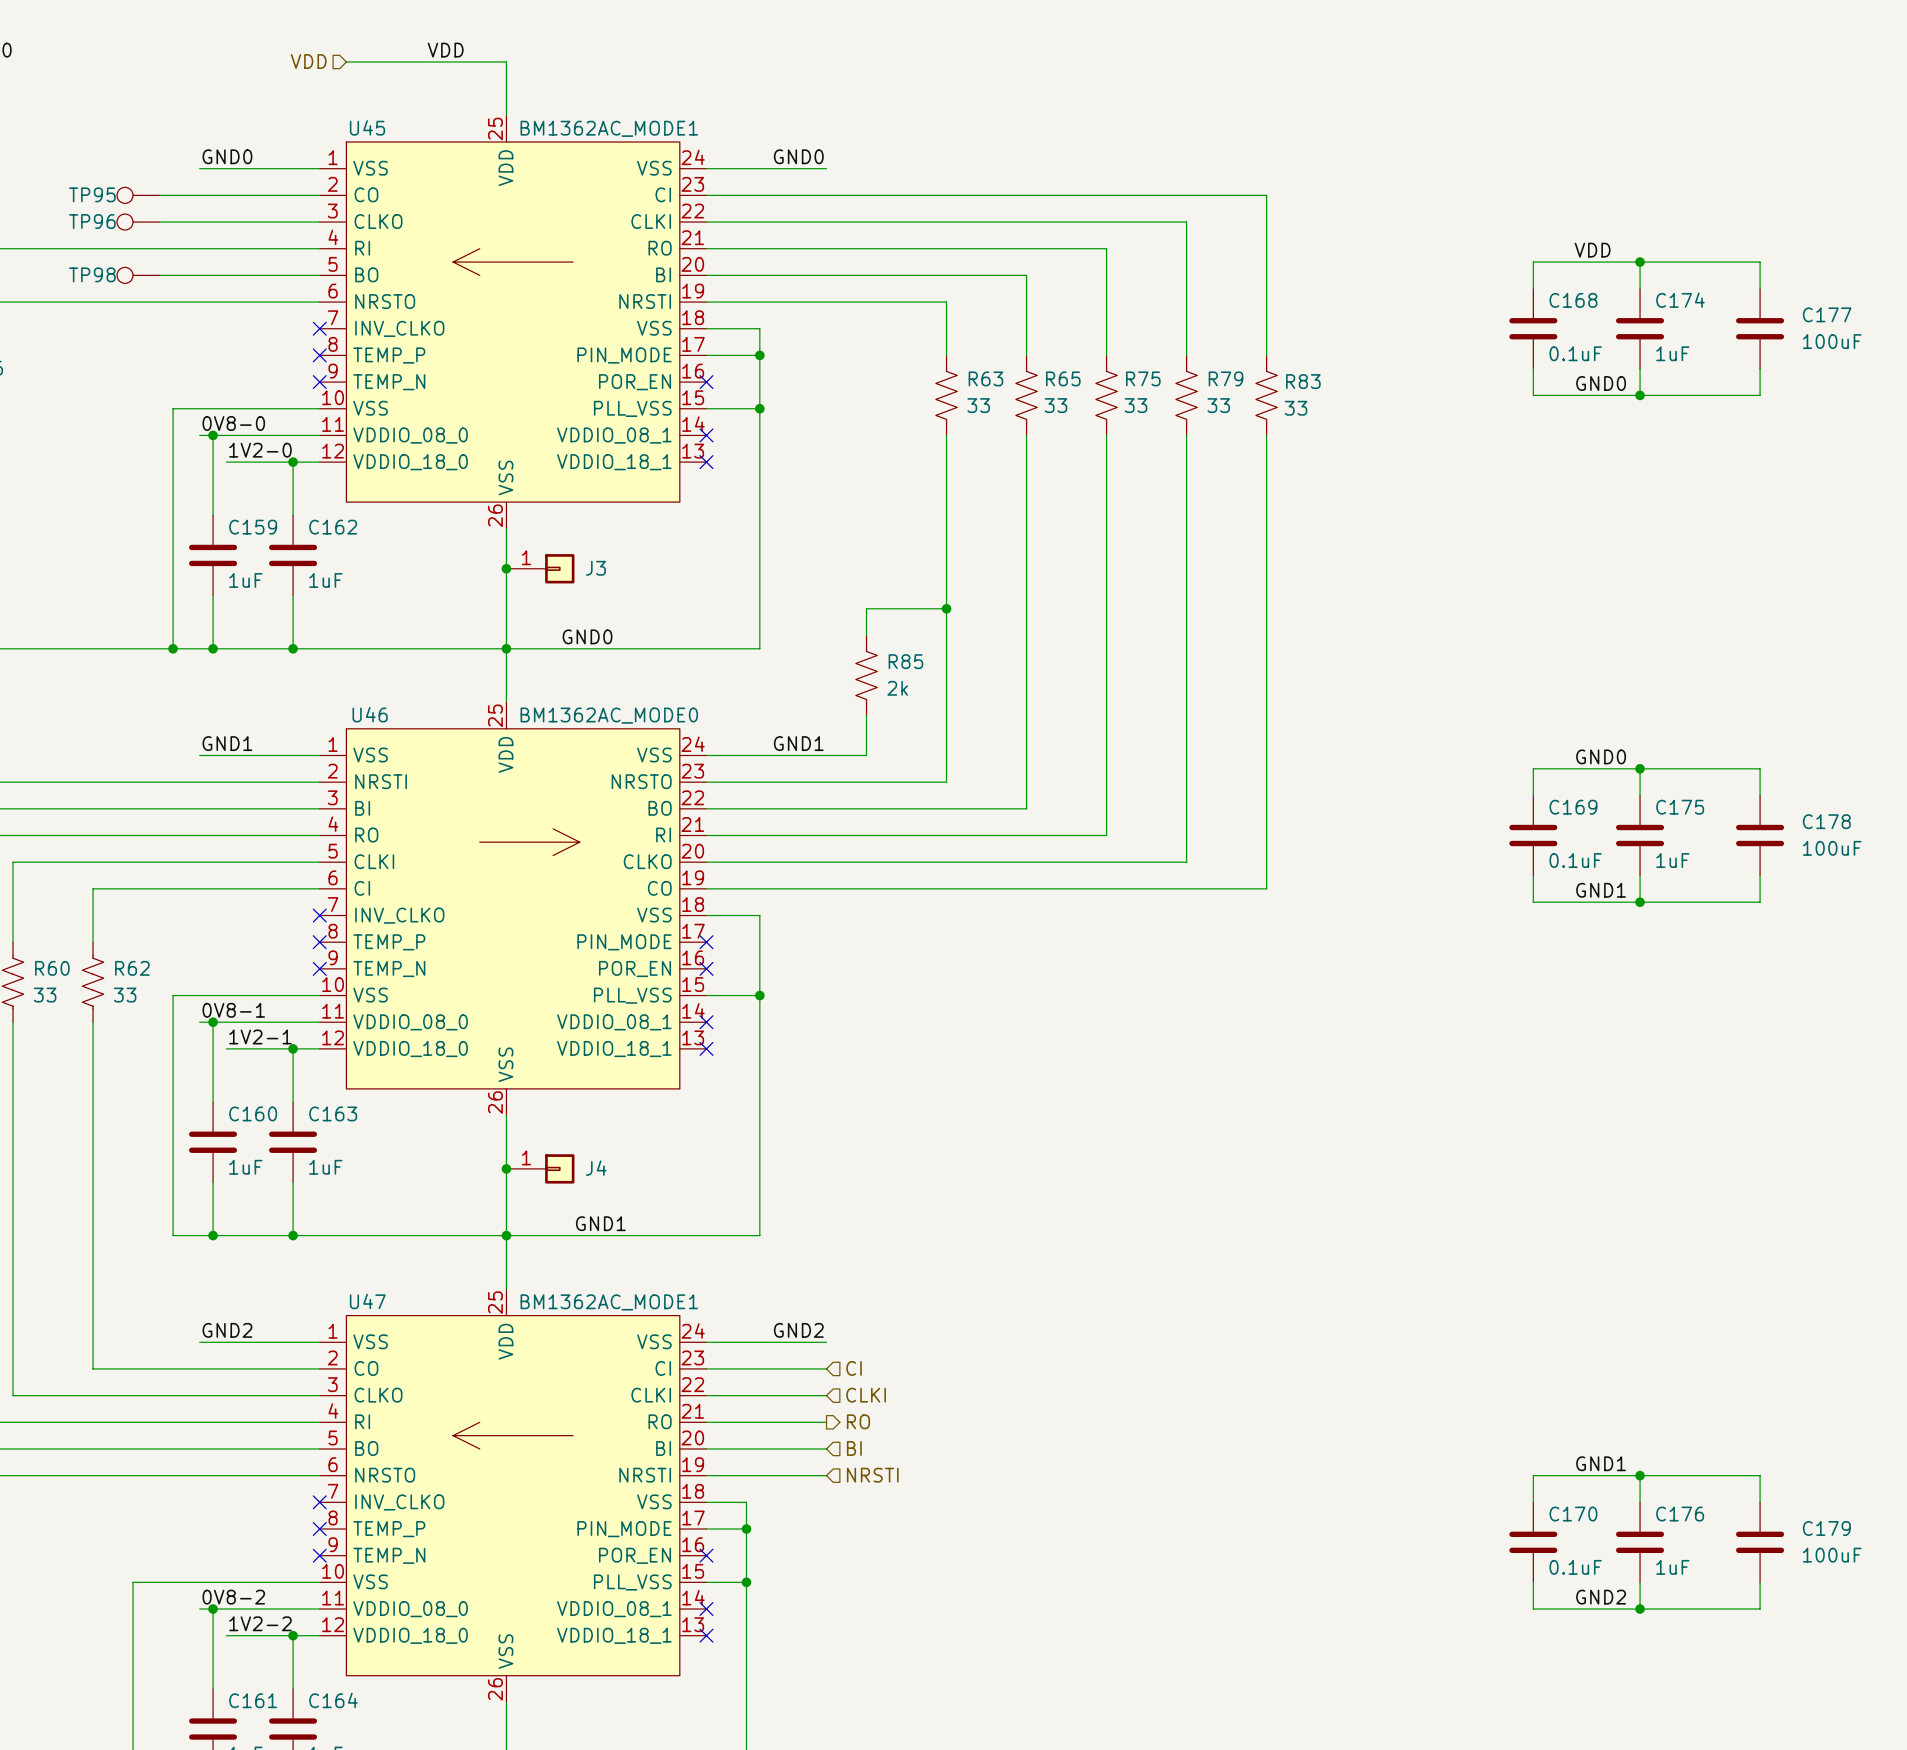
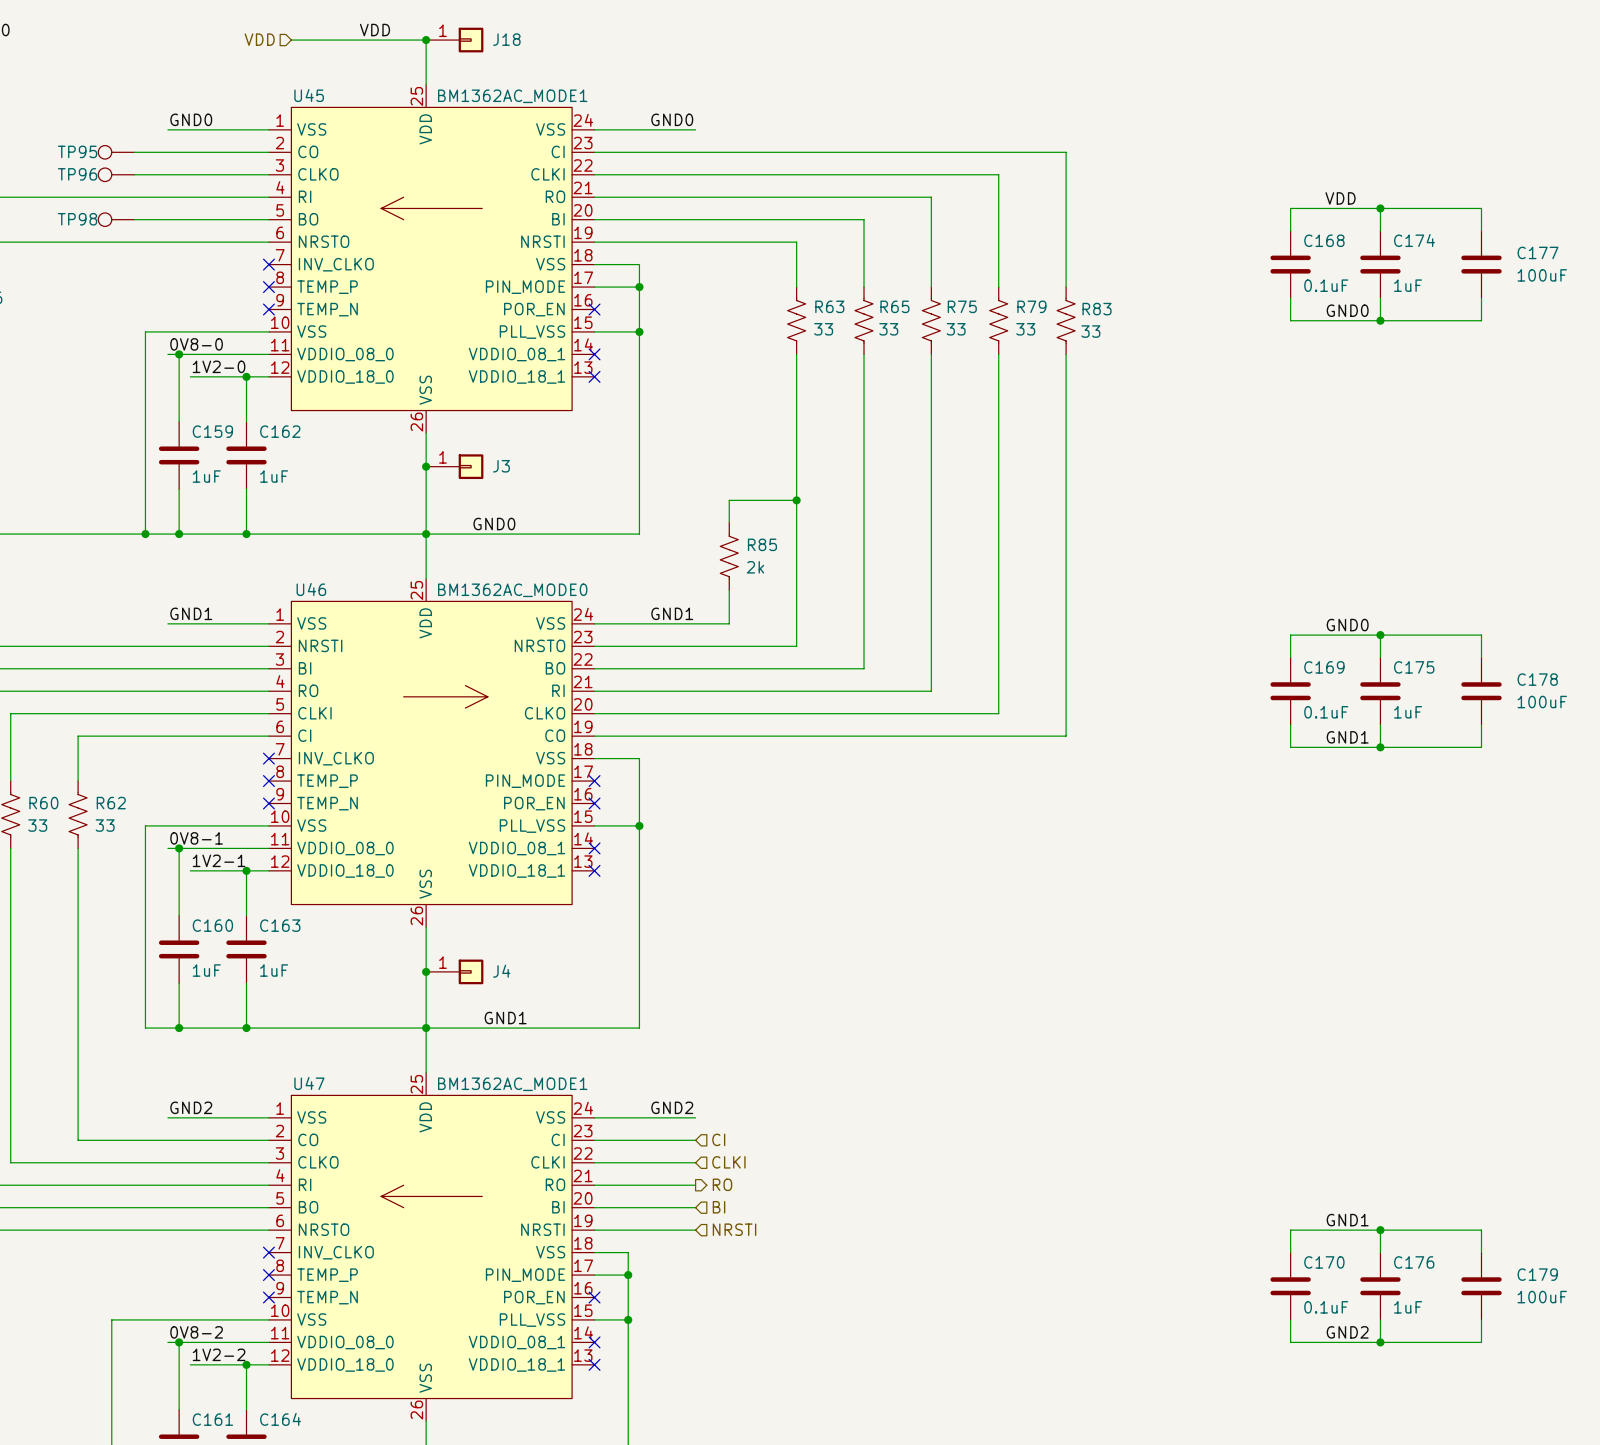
junction: none -> (426, 40)
J18: none -> (454, 40)

